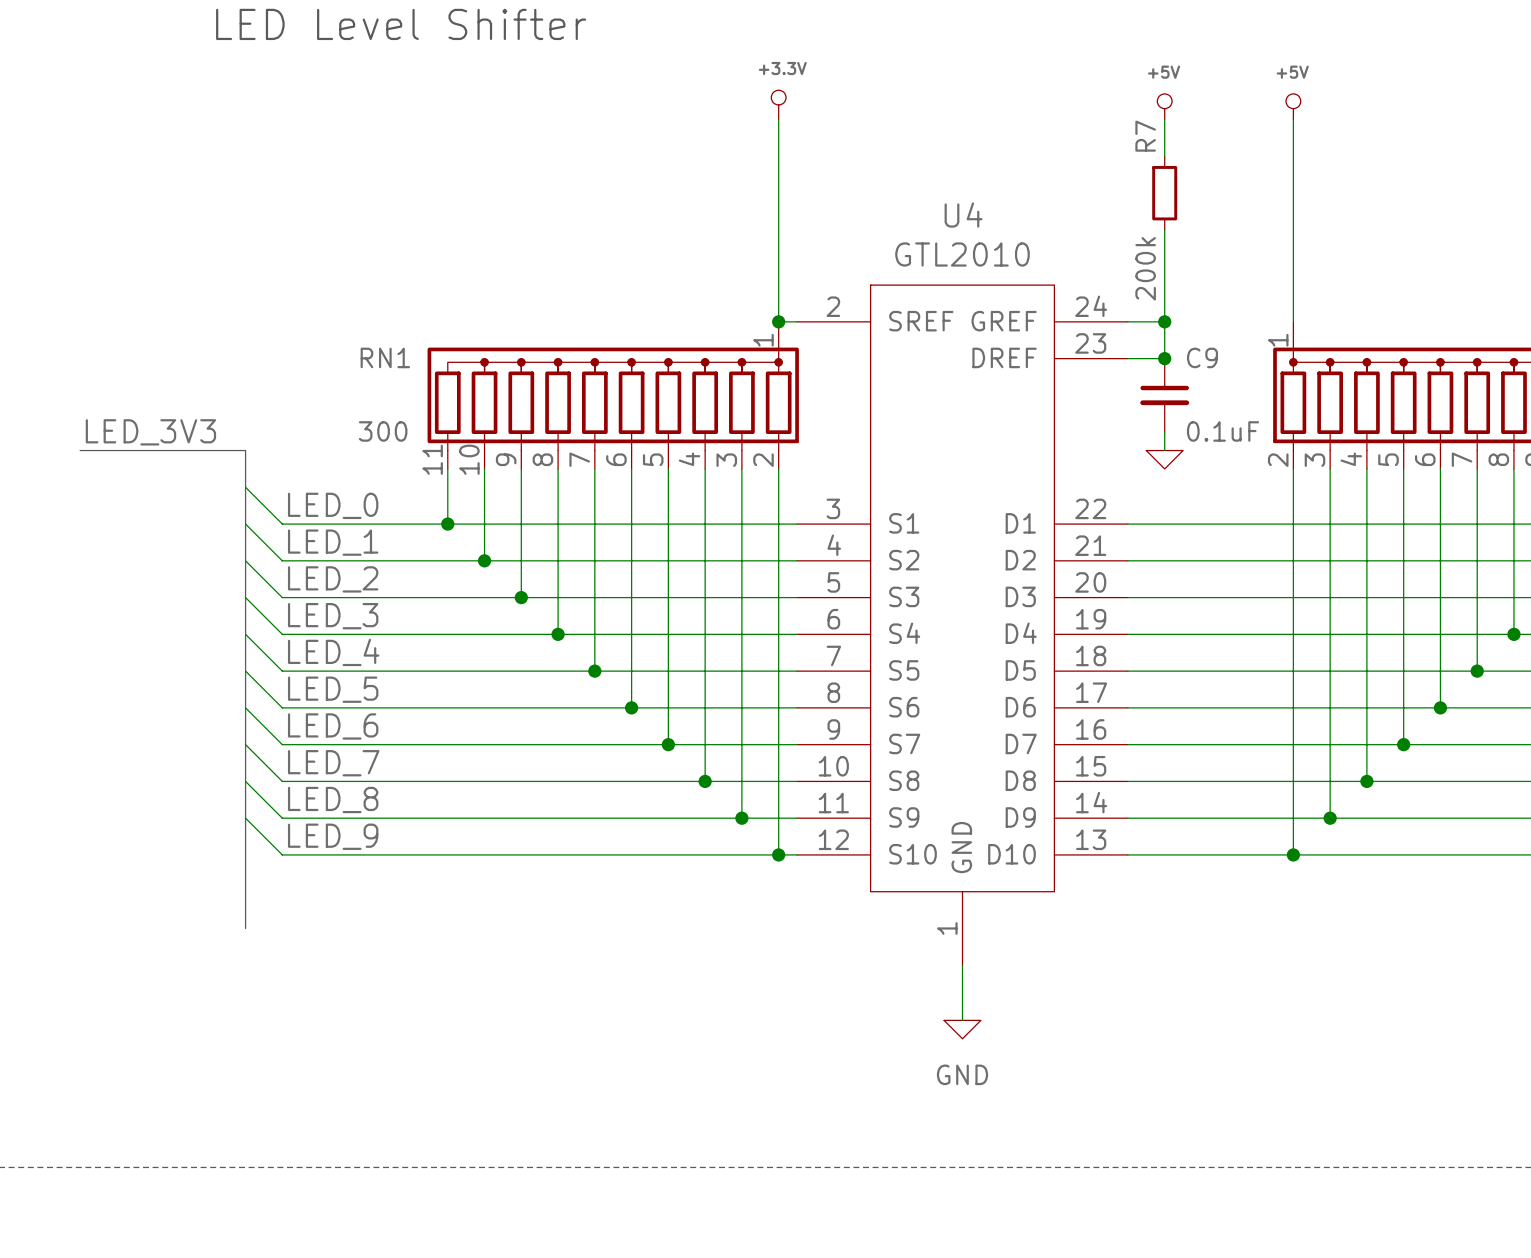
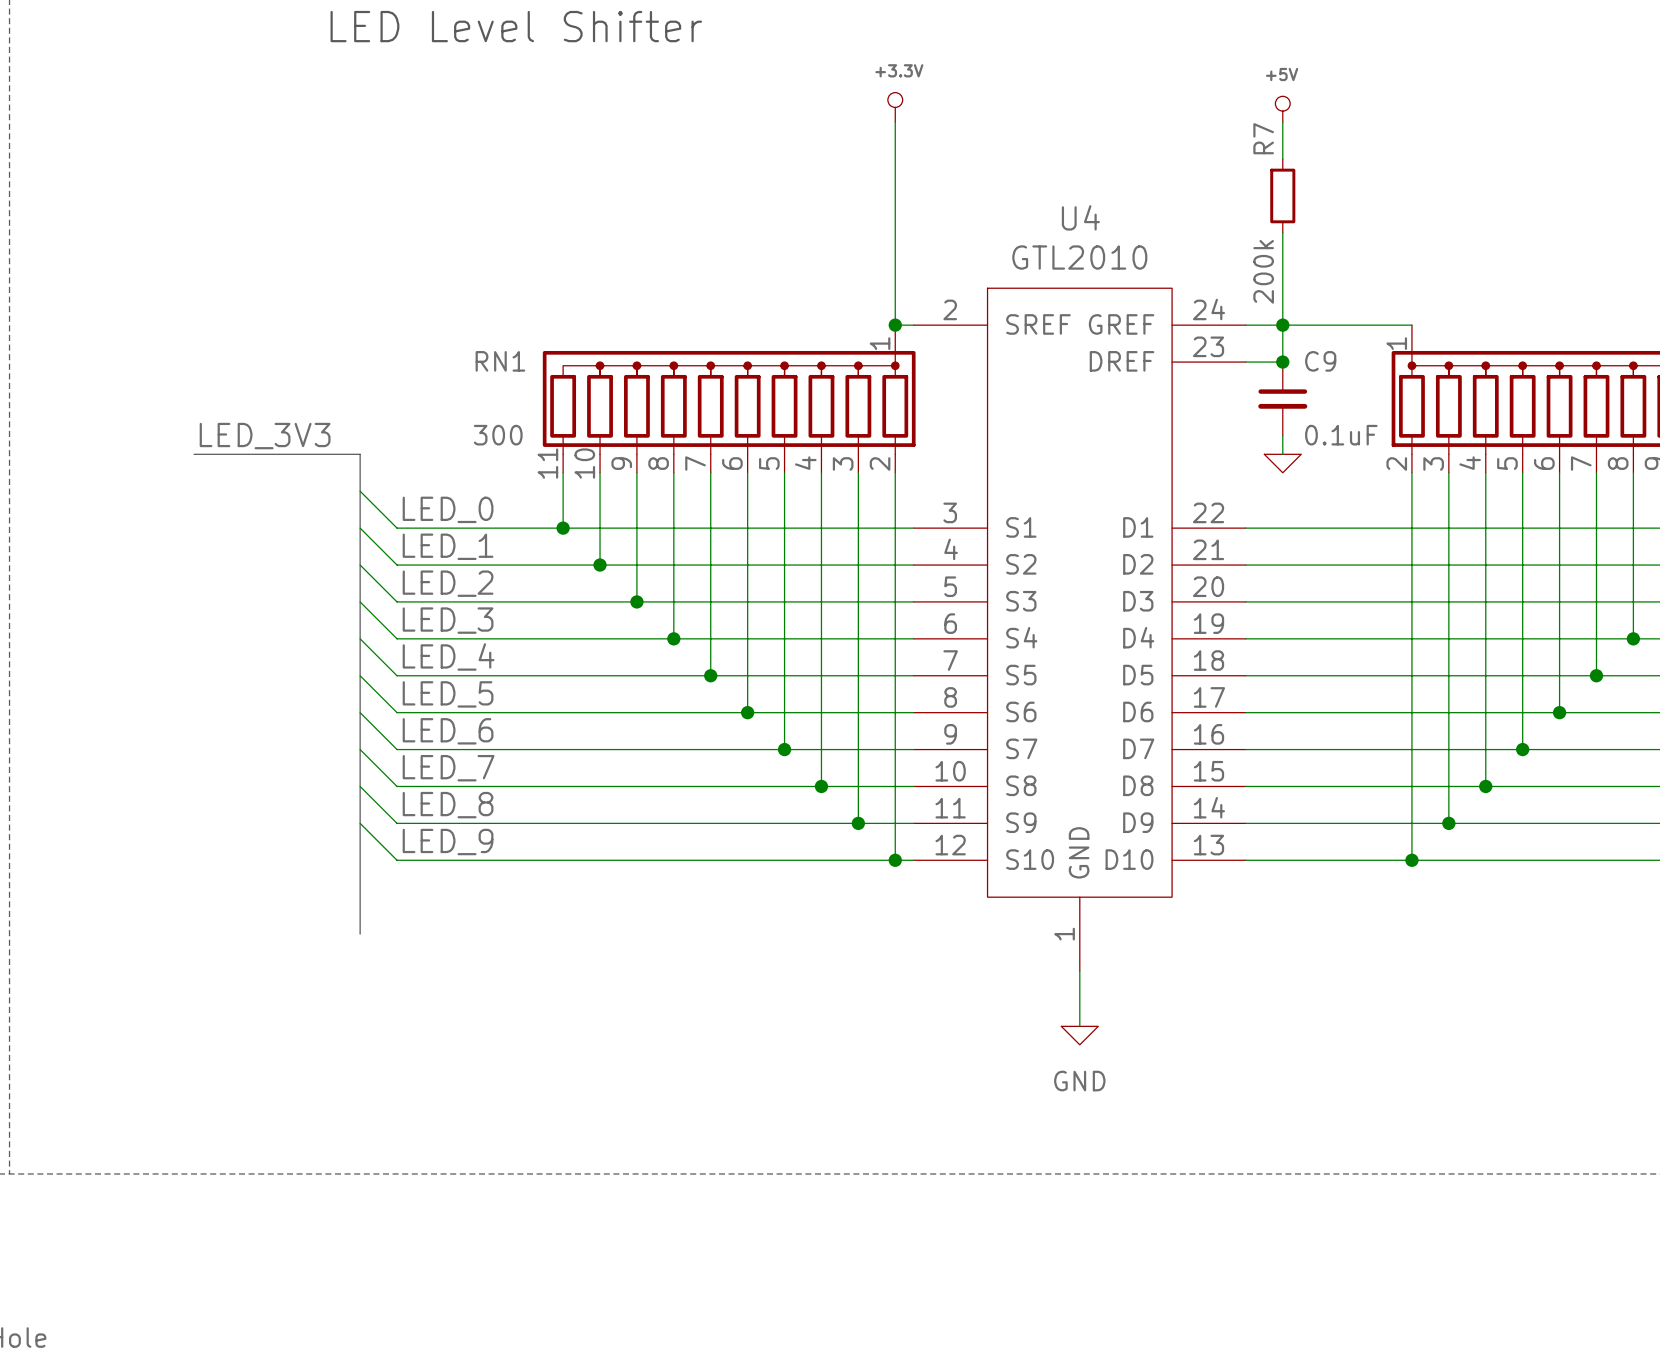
power symbol: +5V (1293, 106) -> none
wire: (1293, 119) (1293, 321) -> (1282, 325) (1411, 325)

